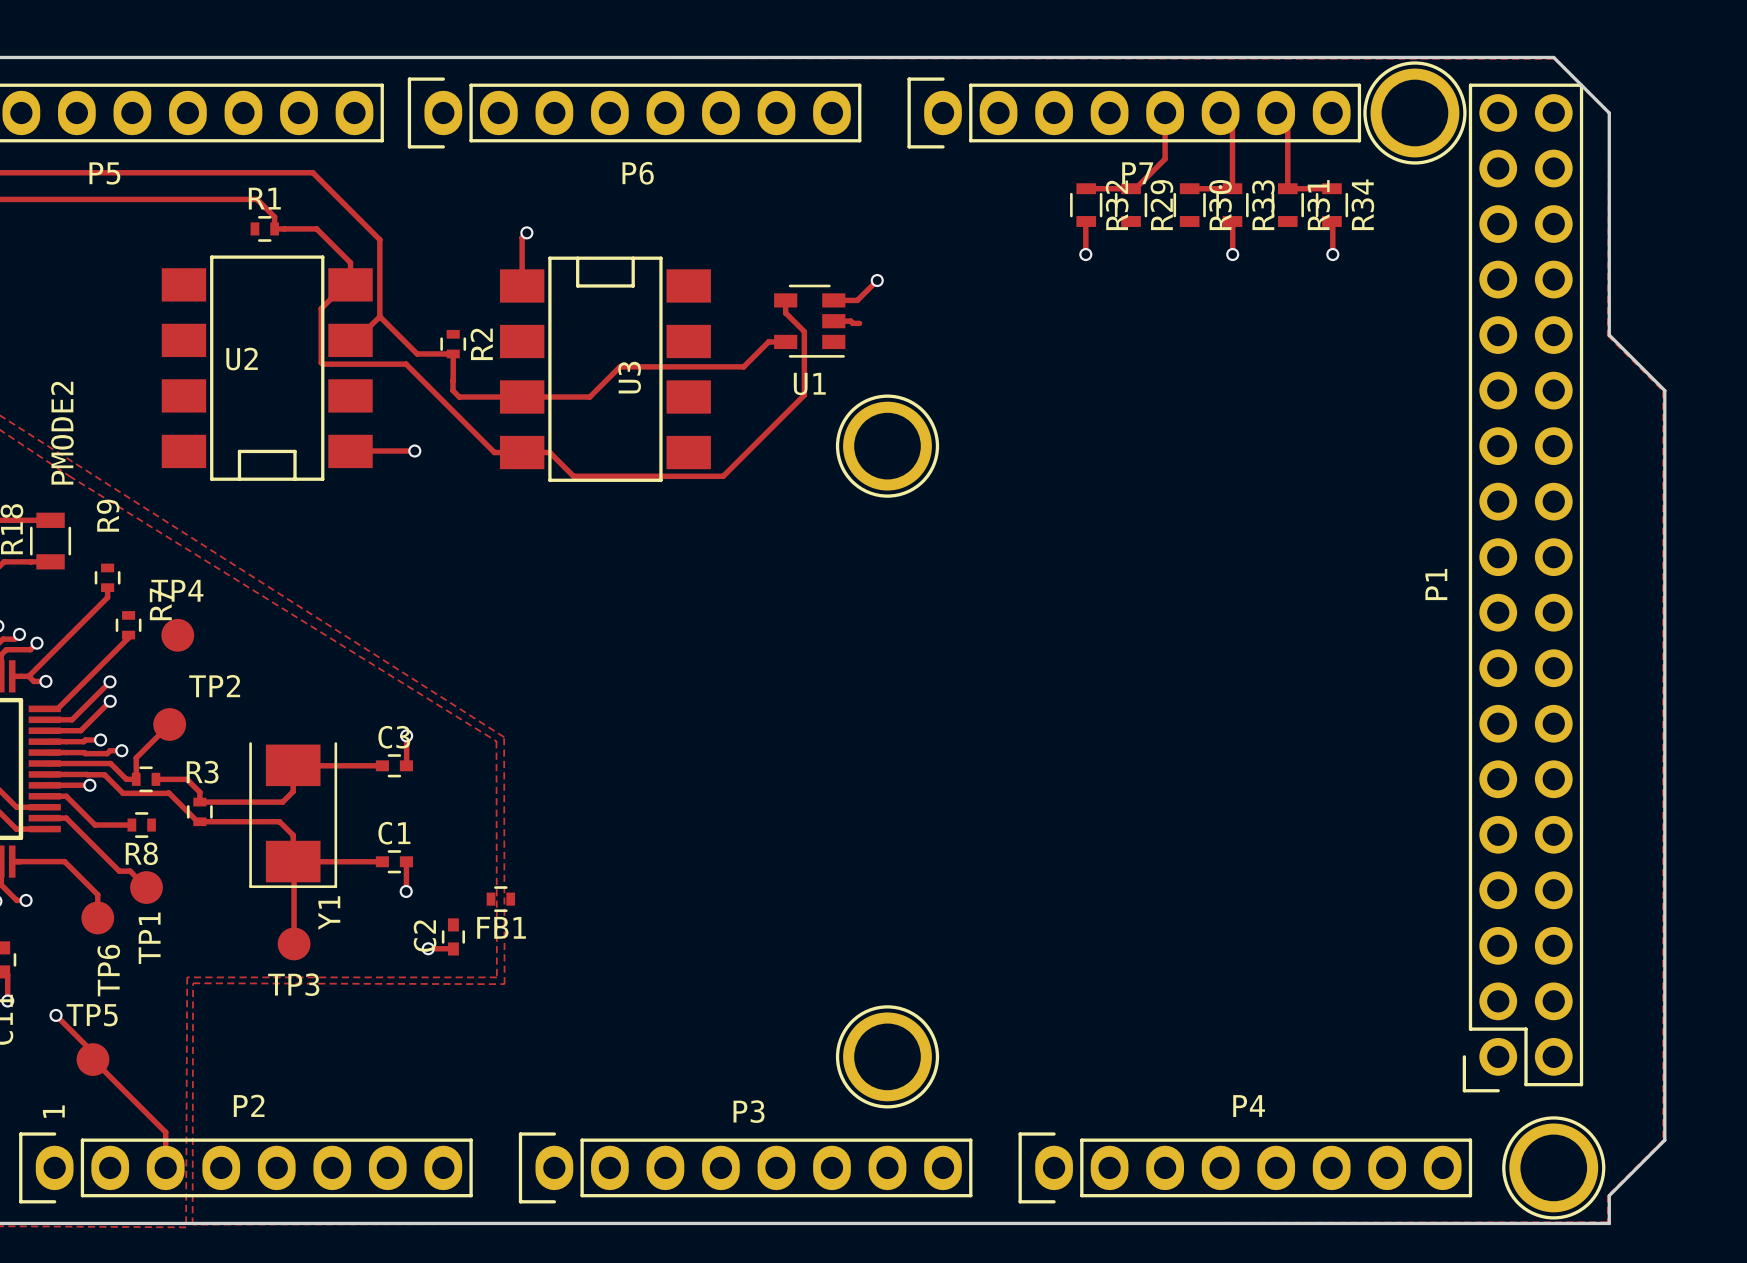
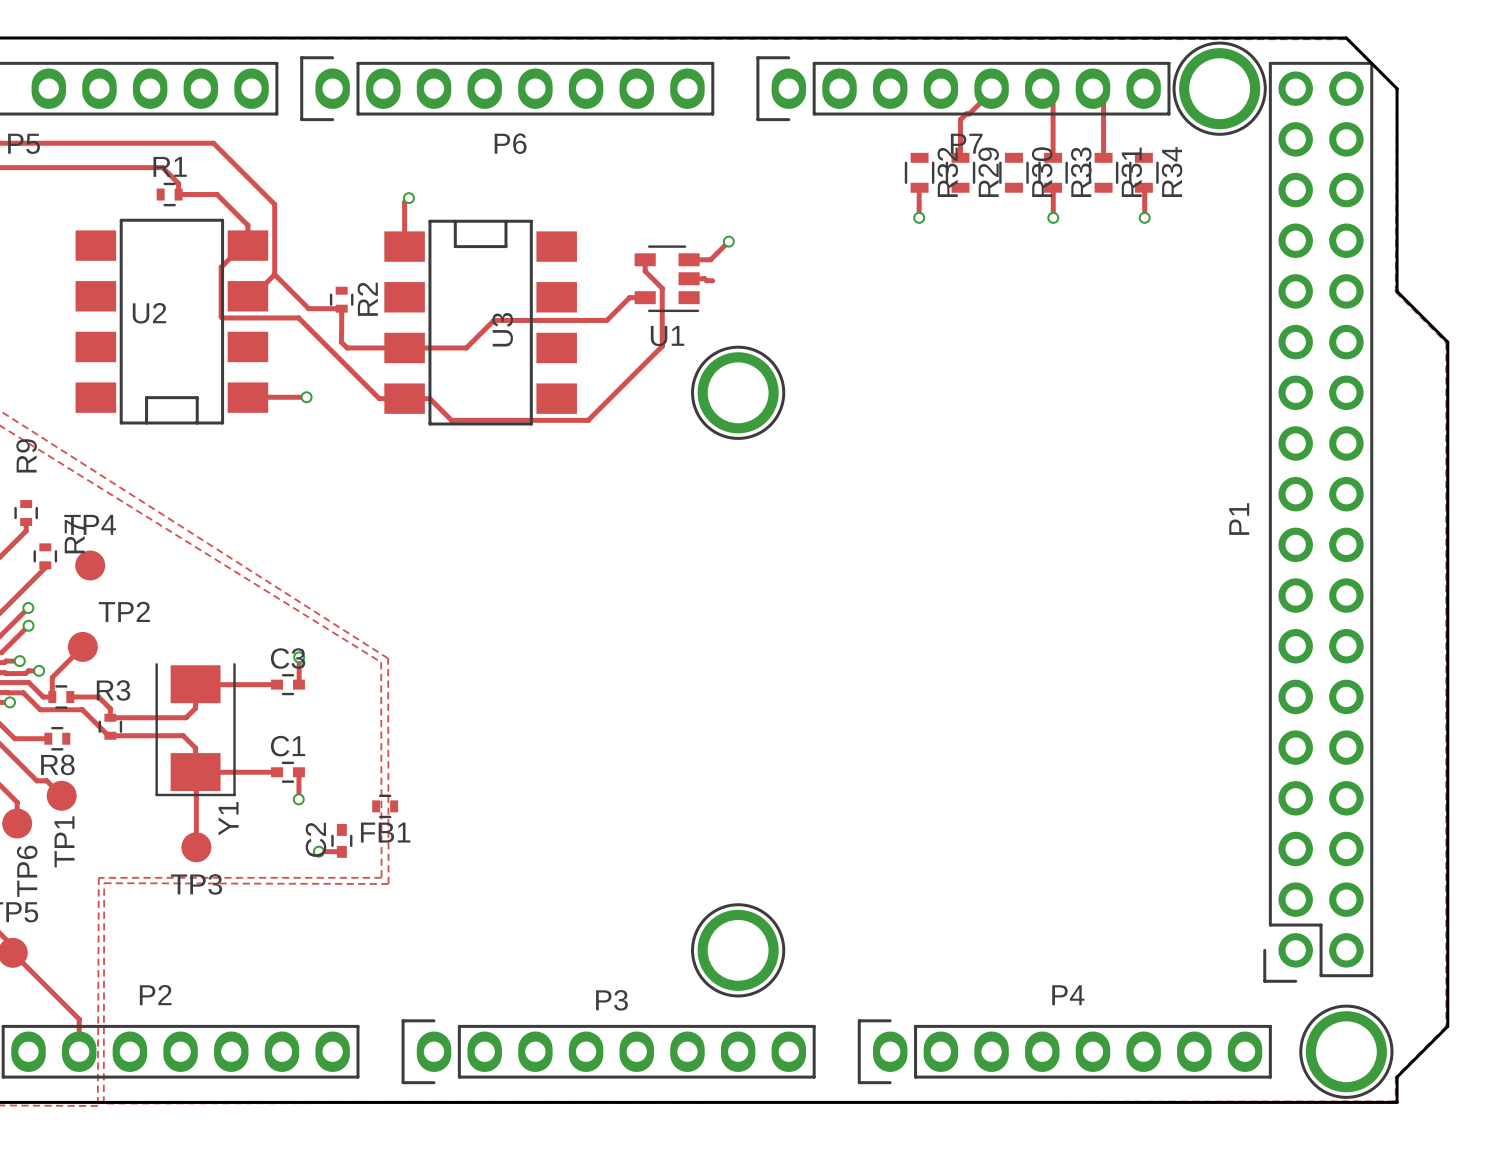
track: (1165, 116) (1165, 159) (1135, 188) (1086, 188) -> (991, 91) (969, 113) (966, 113) (960, 119) (960, 157)
track: (1189, 188) (1232, 188) -> none
track: (1287, 188) (1331, 188) -> none

